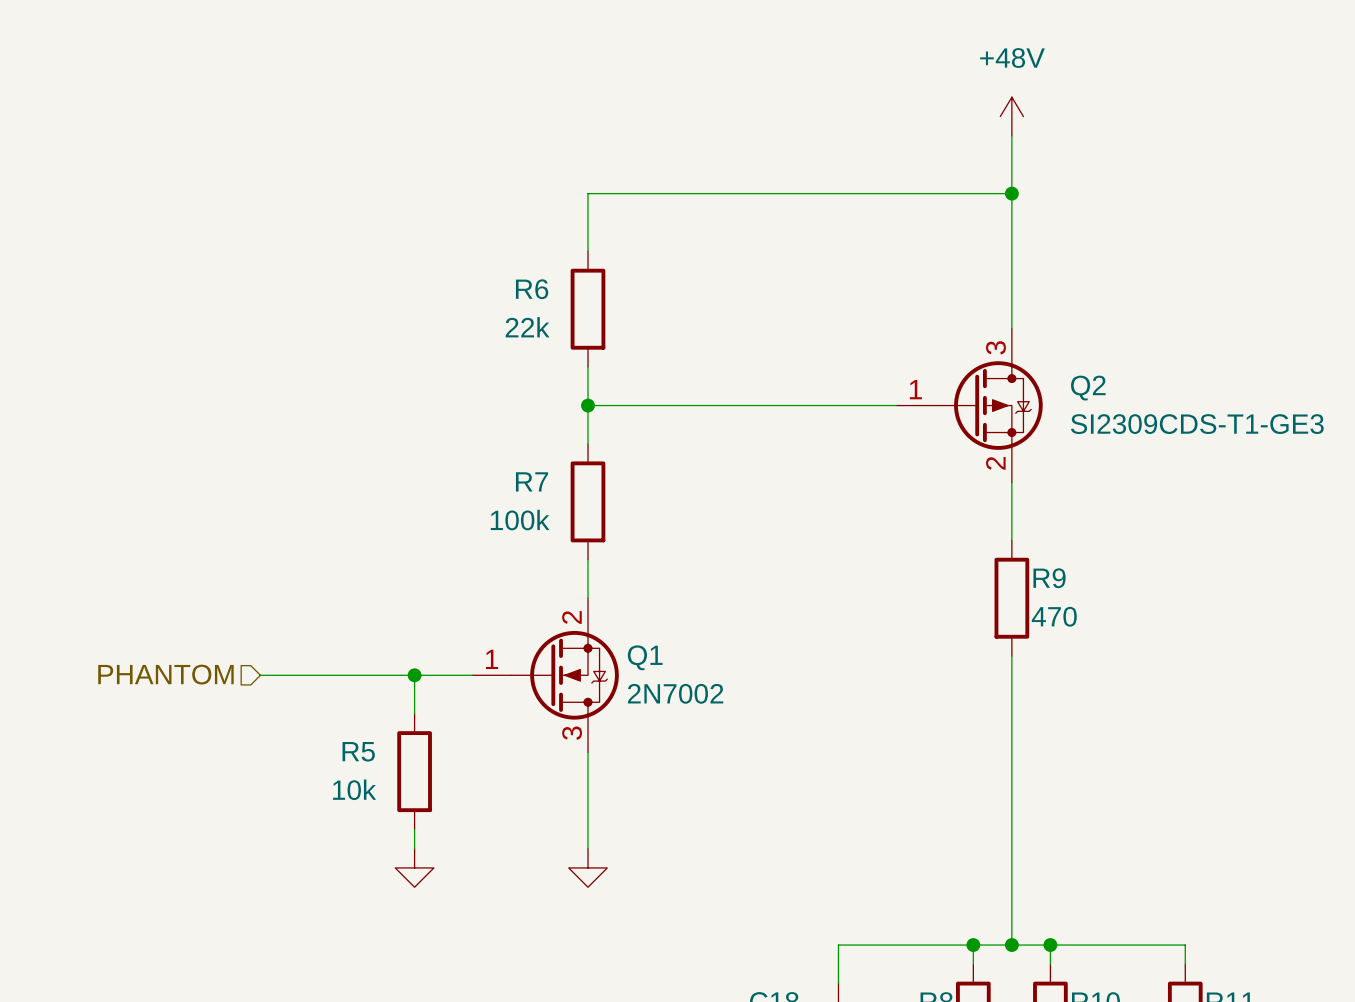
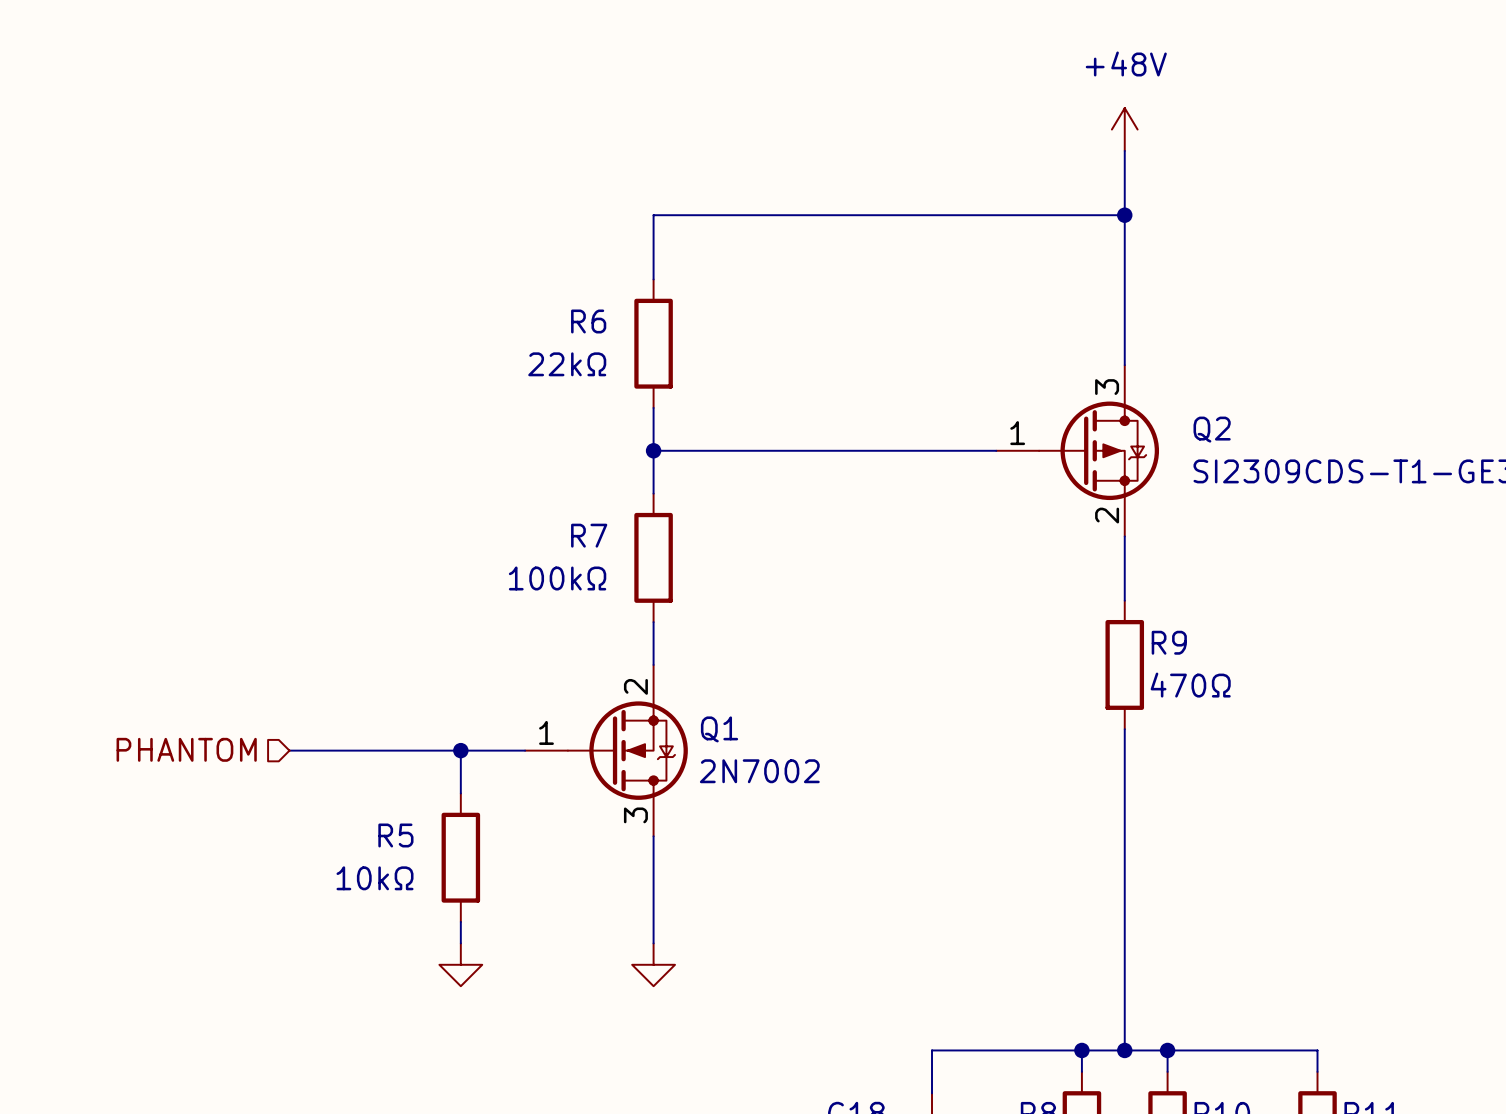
R6 value: 22k (527, 327) -> 22kΩ (567, 364)
R7 value: 100k (520, 520) -> 100kΩ (557, 578)
R9 value: 470 (1054, 616) -> 470Ω (1190, 685)
R5 value: 10k (354, 789) -> 10kΩ (375, 878)

